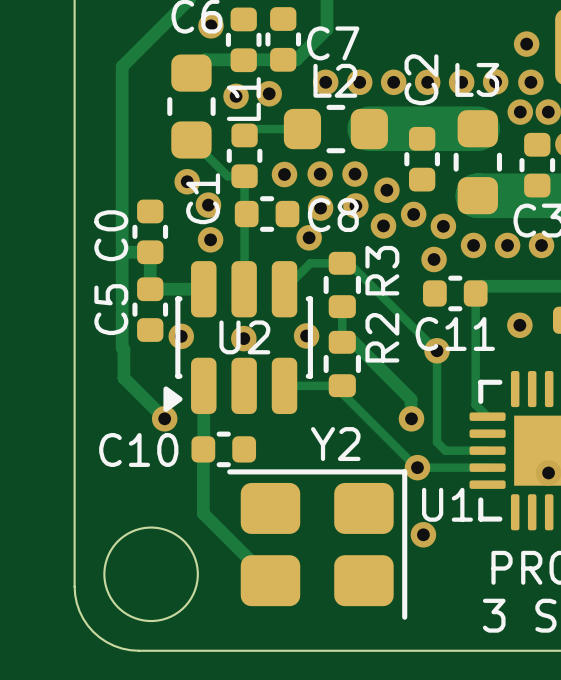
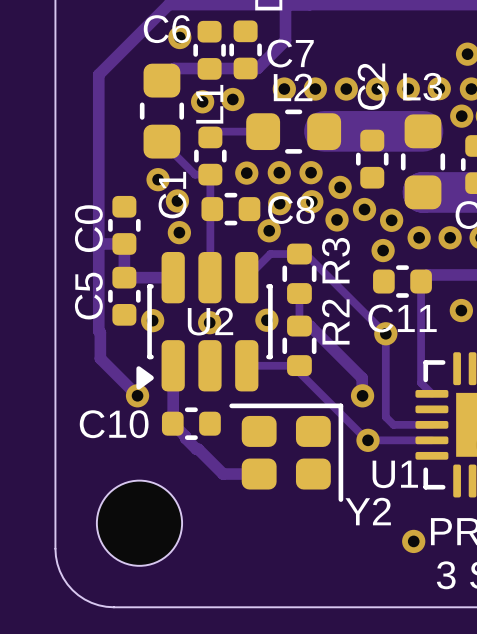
Y2 name position: Y2 (335, 444) -> Y2 (368, 511)
track: (203, 449) (203, 513) (270, 580) -> (172, 423) (223, 474) (259, 474)
Y2 footprint: [227, 469, 408, 620] -> [229, 403, 344, 502]
round board edge: [103, 526, 199, 623] -> none
via position: (423, 534) -> (413, 541)
part: none -> (139, 523)

